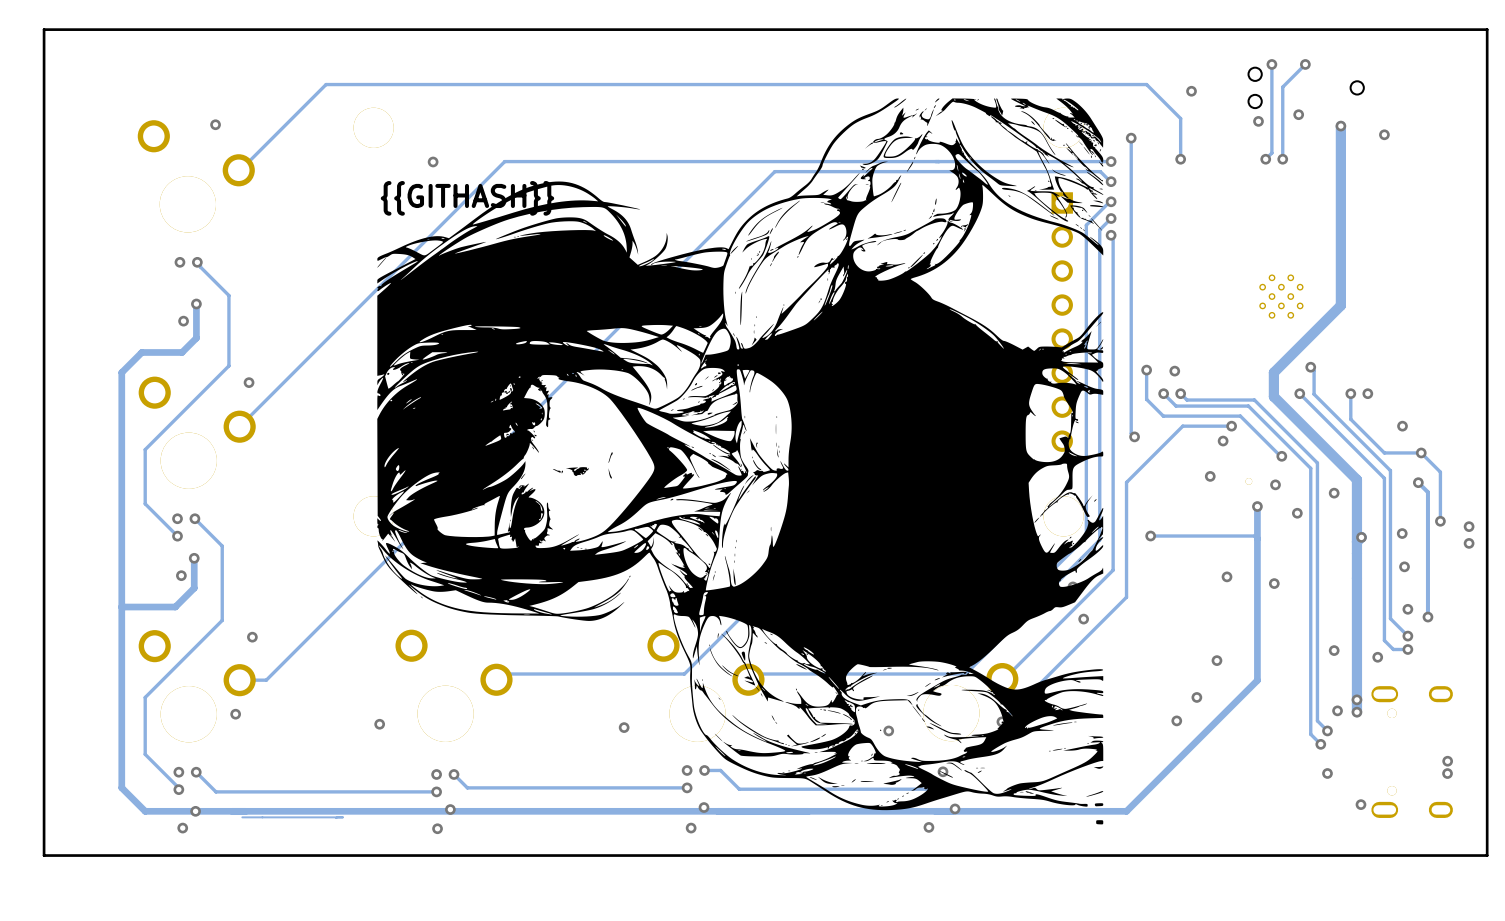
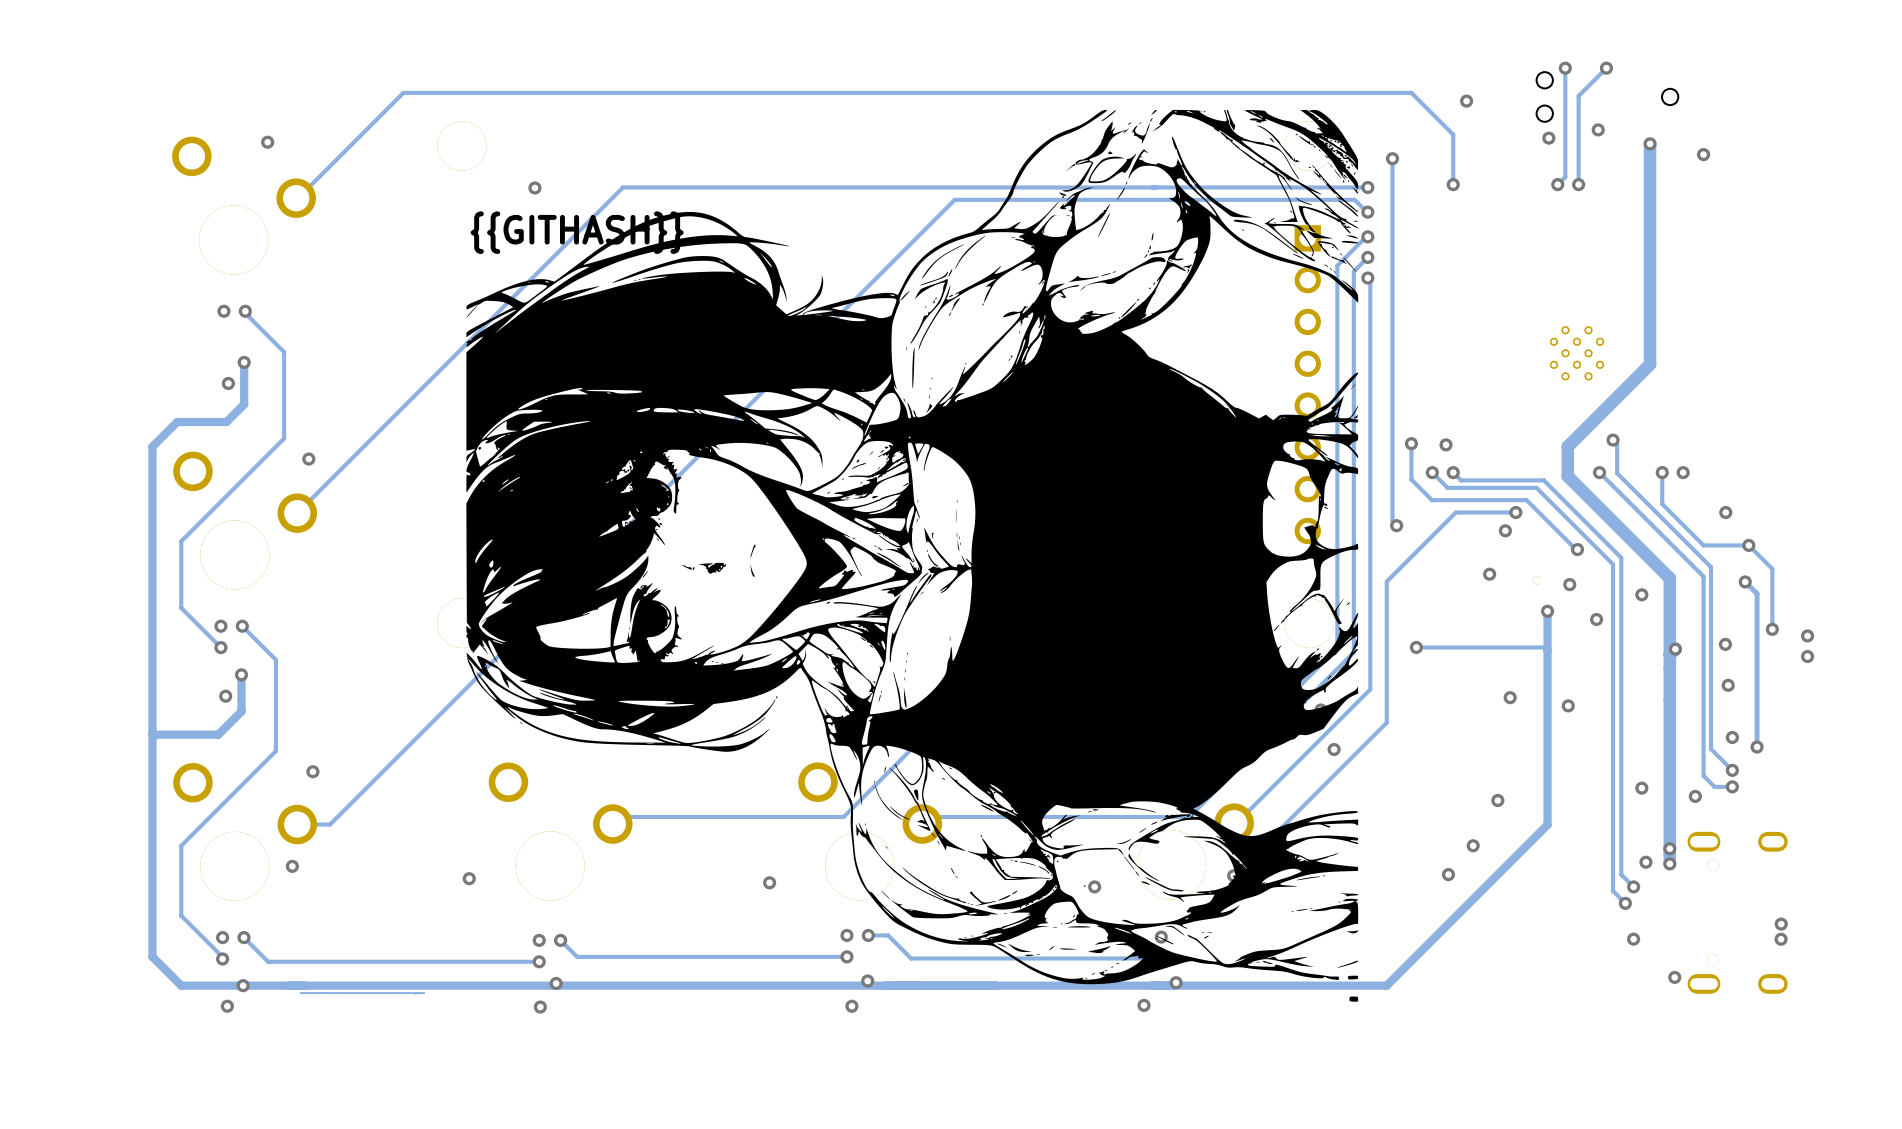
board edge: (1487, 29) (44, 29) (44, 855) (1487, 855) (1487, 29) -> none

